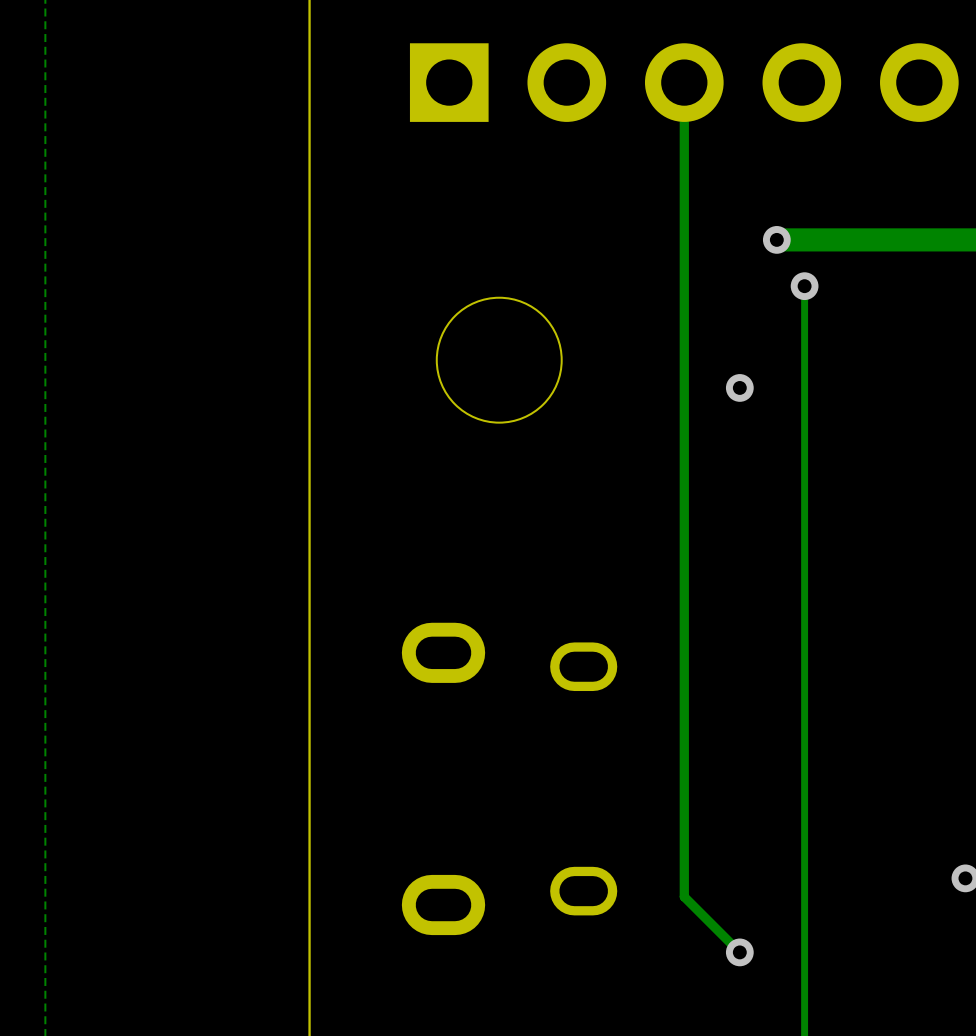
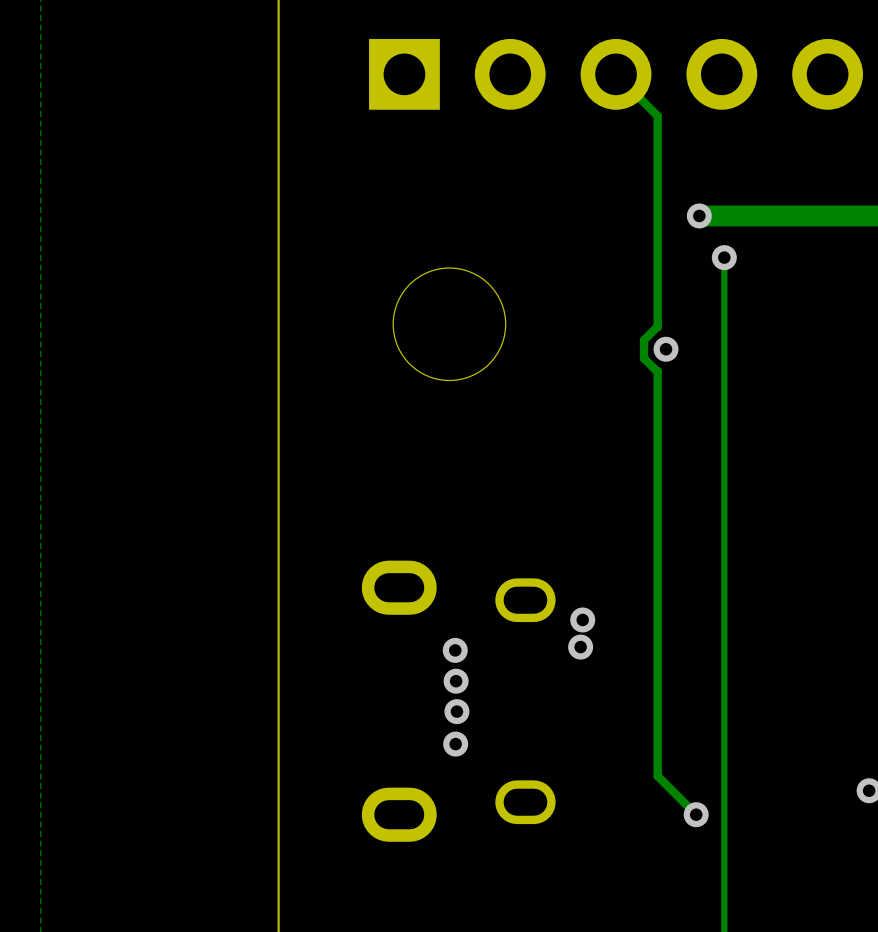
track: (684, 82) (684, 896) (739, 952) -> (616, 74) (657, 116) (657, 327)
track: none -> (656, 327) (644, 340) (644, 358) (656, 371)
track: none -> (657, 371) (657, 776) (696, 814)
via: none -> (582, 619)
via: none -> (580, 647)
via: none -> (455, 650)
via: none -> (456, 681)
via: none -> (456, 711)
via: none -> (455, 744)
via position: (739, 952) -> (696, 814)

